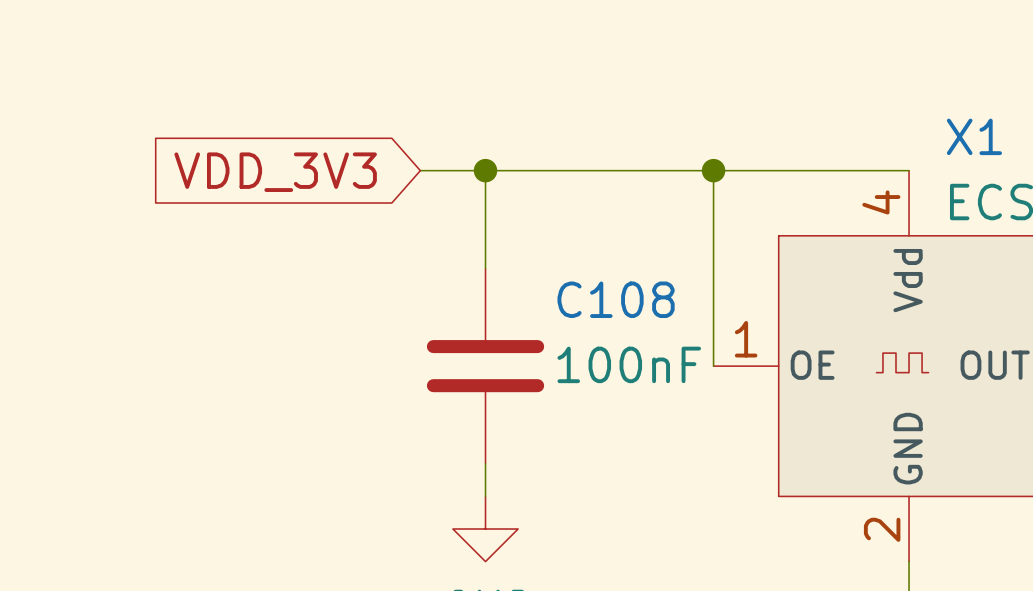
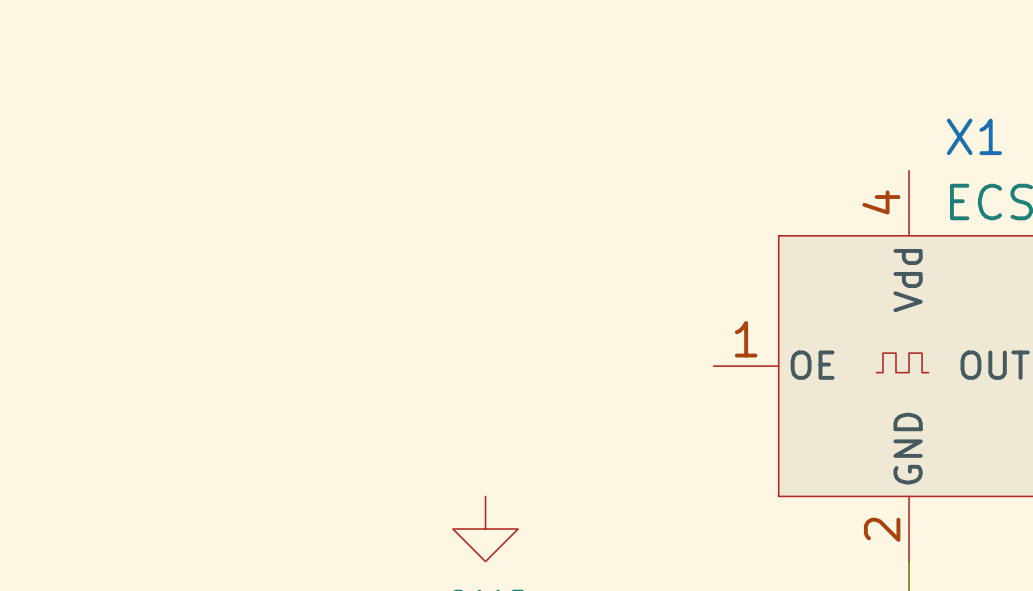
wire: (420, 170) (909, 170) -> none
wire: (485, 170) (485, 268) -> none
junction: (485, 170) -> none
wire: (713, 170) (713, 366) -> none
junction: (713, 170) -> none
global label: VDD_3V3 (275, 172) -> none
C108: 100nF (485, 366) -> none
wire: (485, 463) (485, 496) -> none

